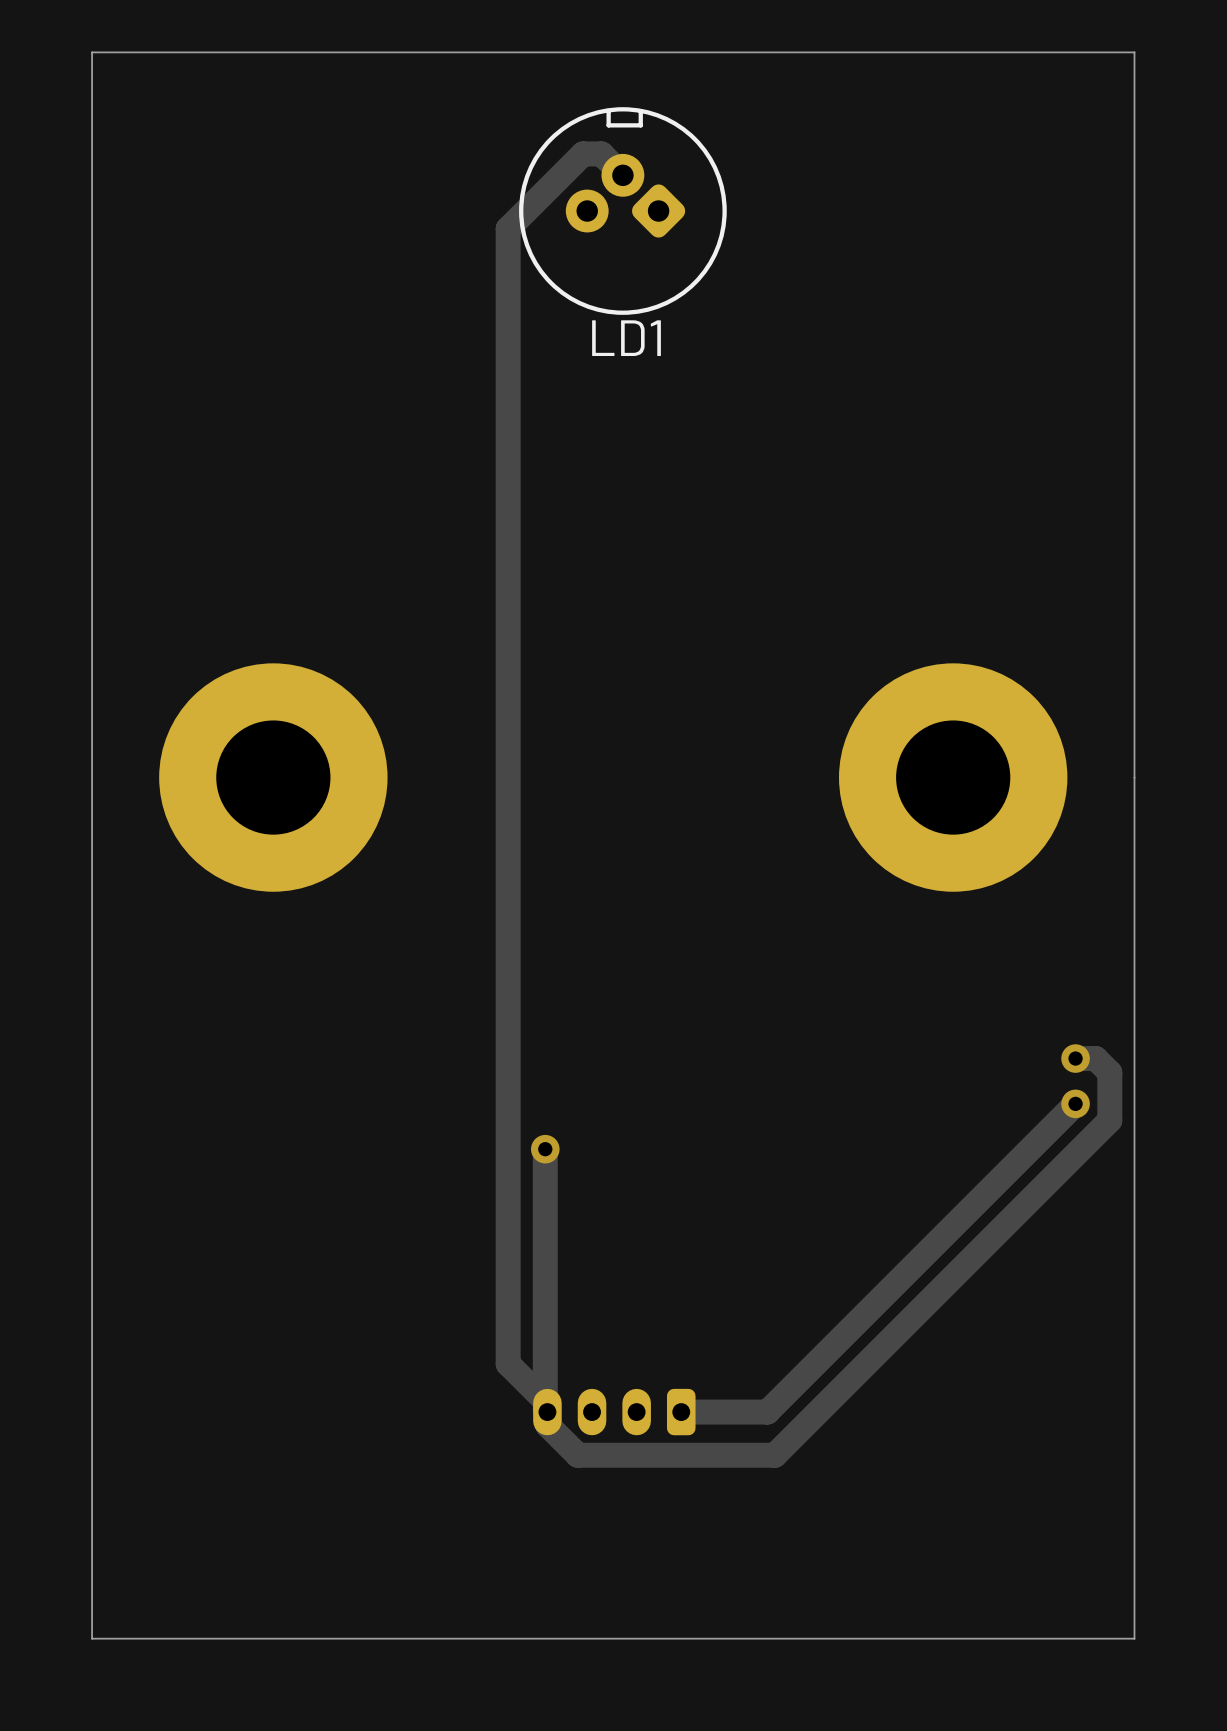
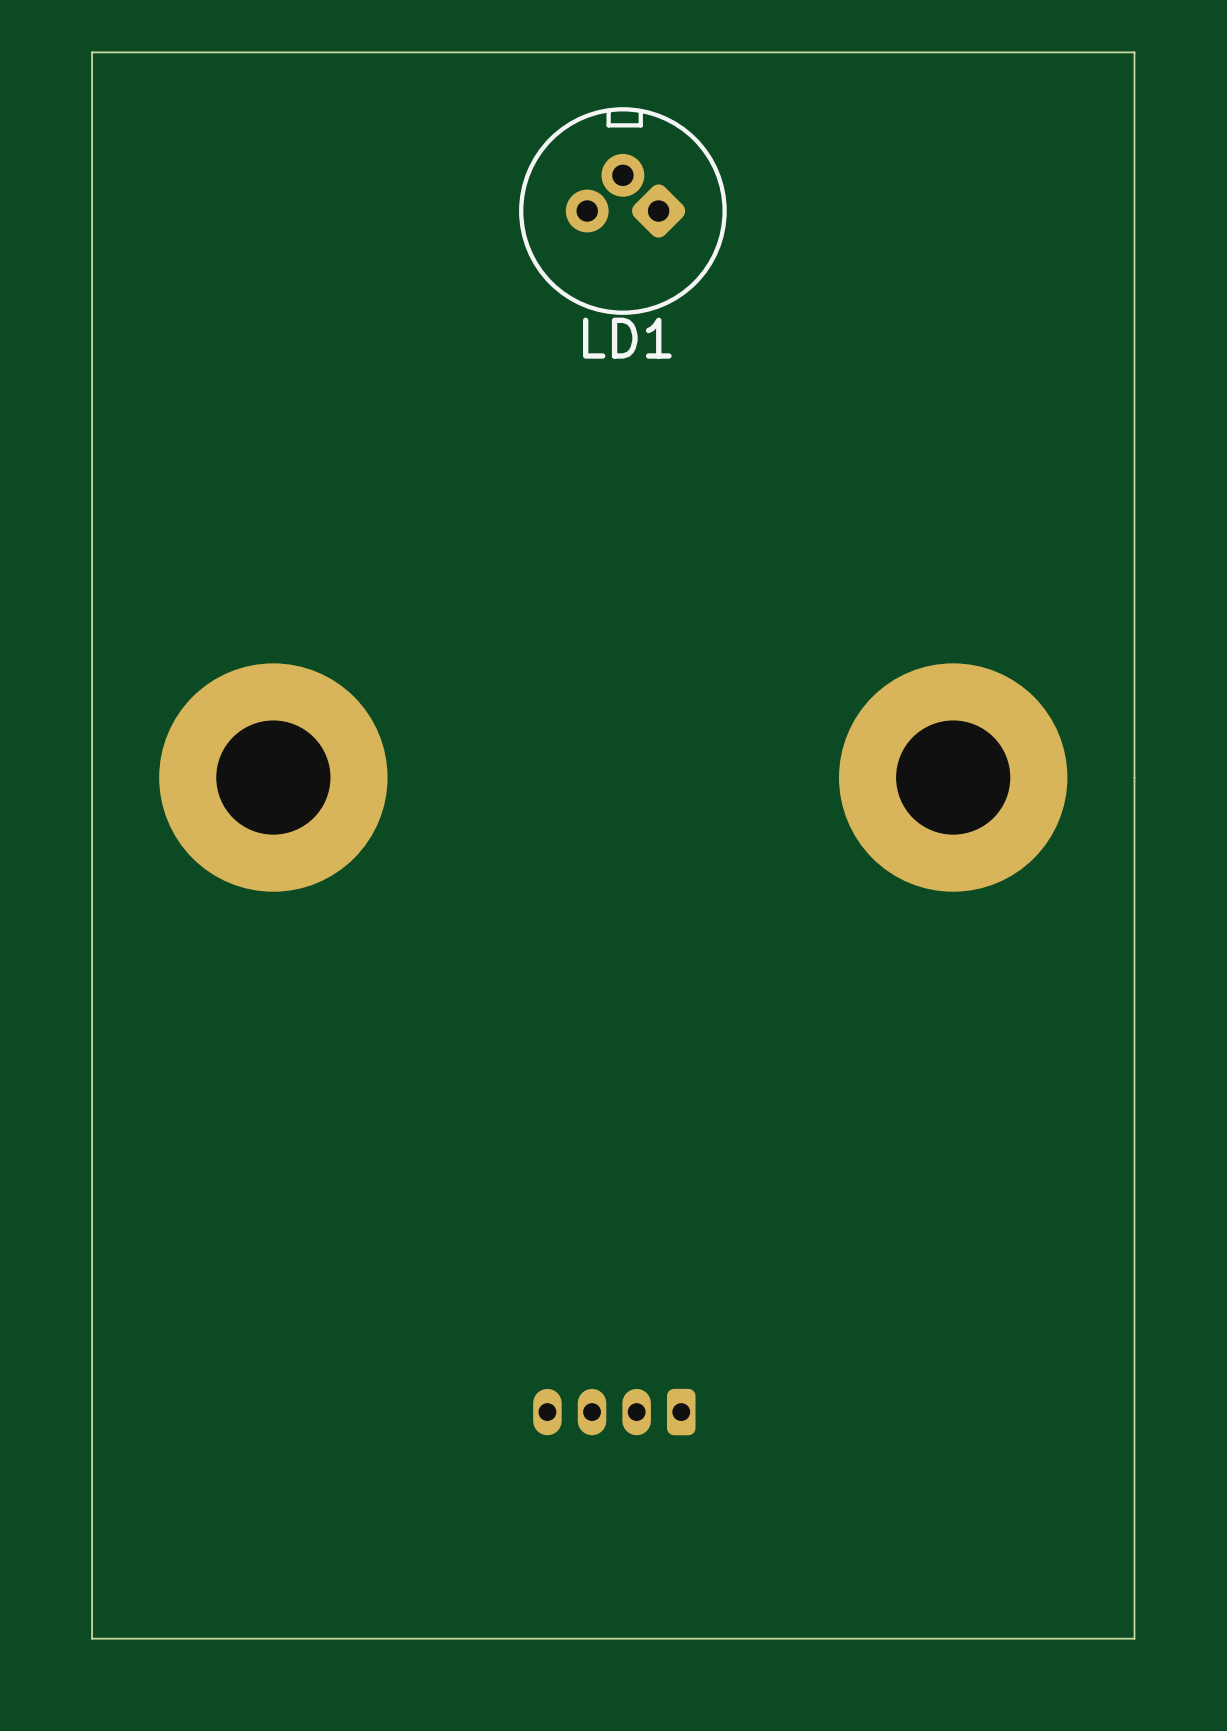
track: (622, 175) (601, 153) (583, 153) (508, 228) (508, 1363) (547, 1403) (547, 1424) (577, 1455) (774, 1455) (1109, 1120) (1109, 1072) (1095, 1058) (1075, 1058) -> none
via: (1075, 1058) -> none
track: (1075, 1103) (767, 1412) (681, 1412) -> none
via: (1075, 1103) -> none
track: (545, 1149) (545, 1409) (547, 1412) -> none
via: (545, 1149) -> none

